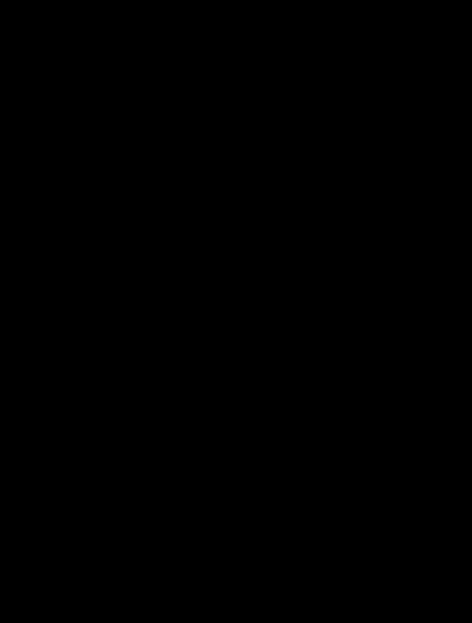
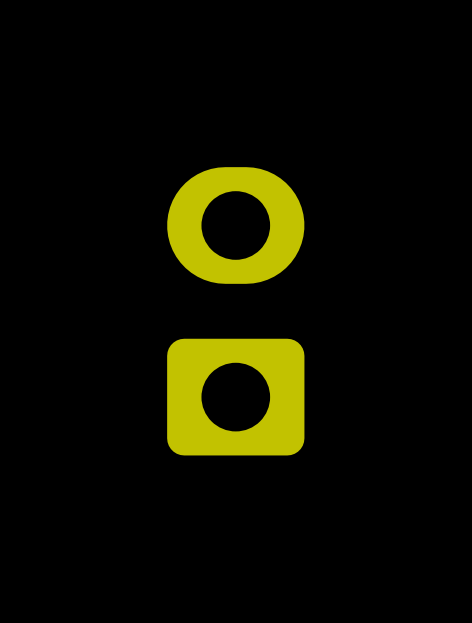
part: none -> (235, 311)

